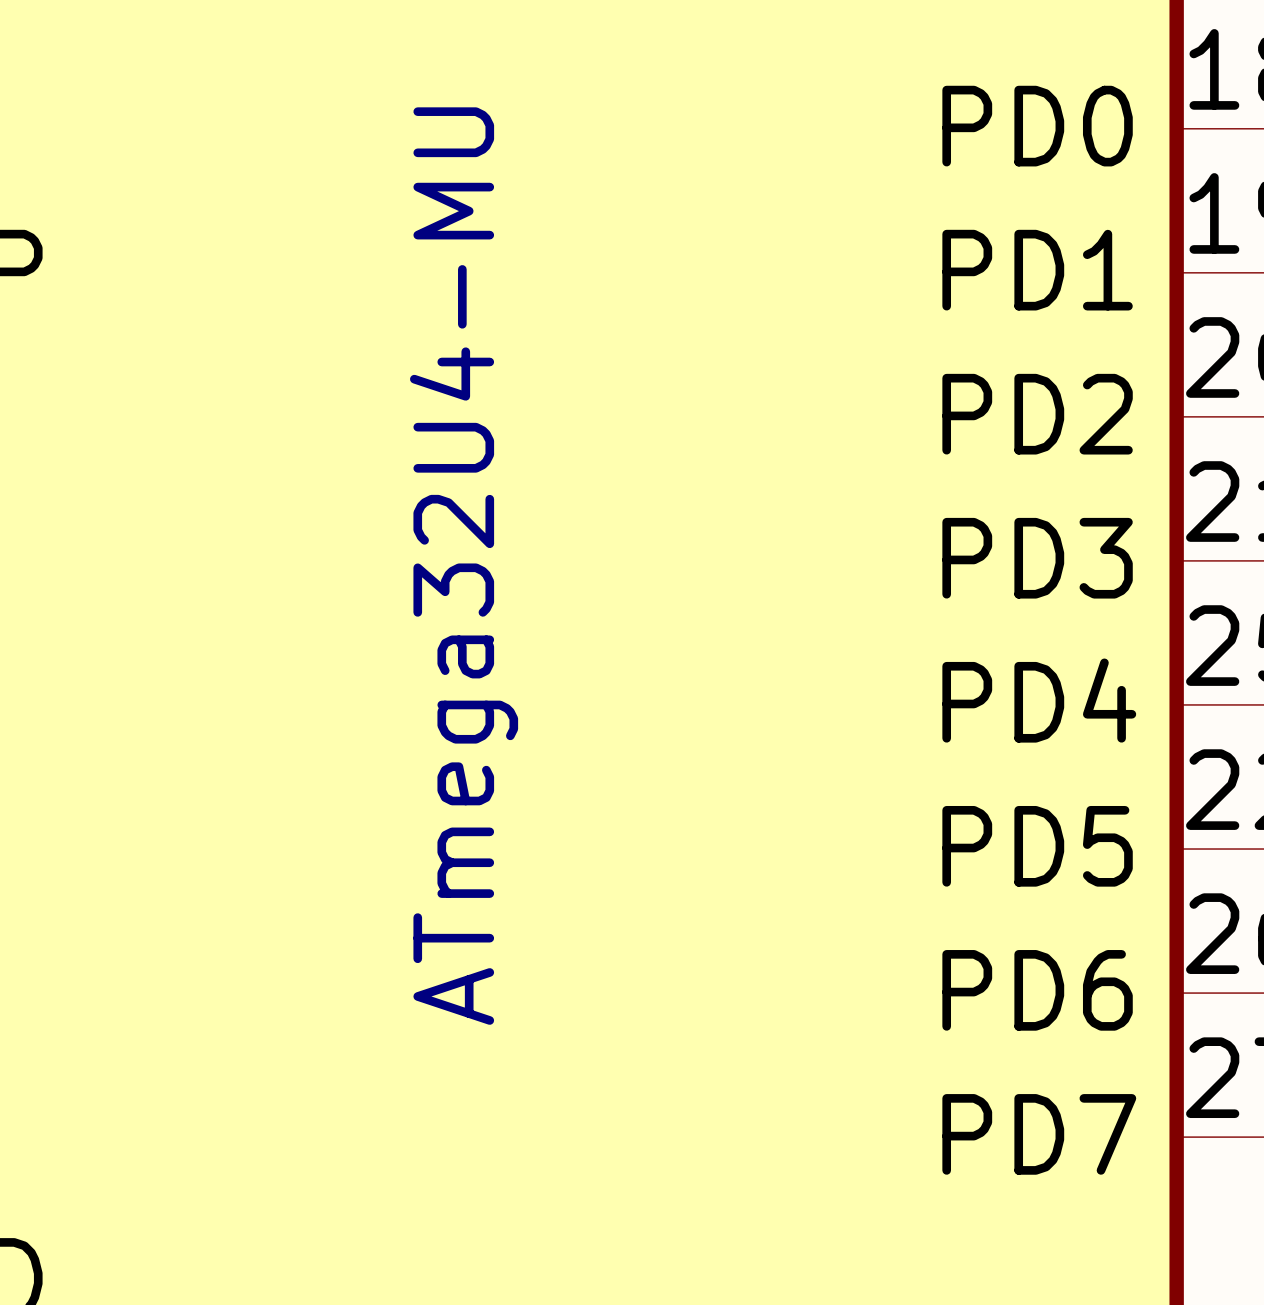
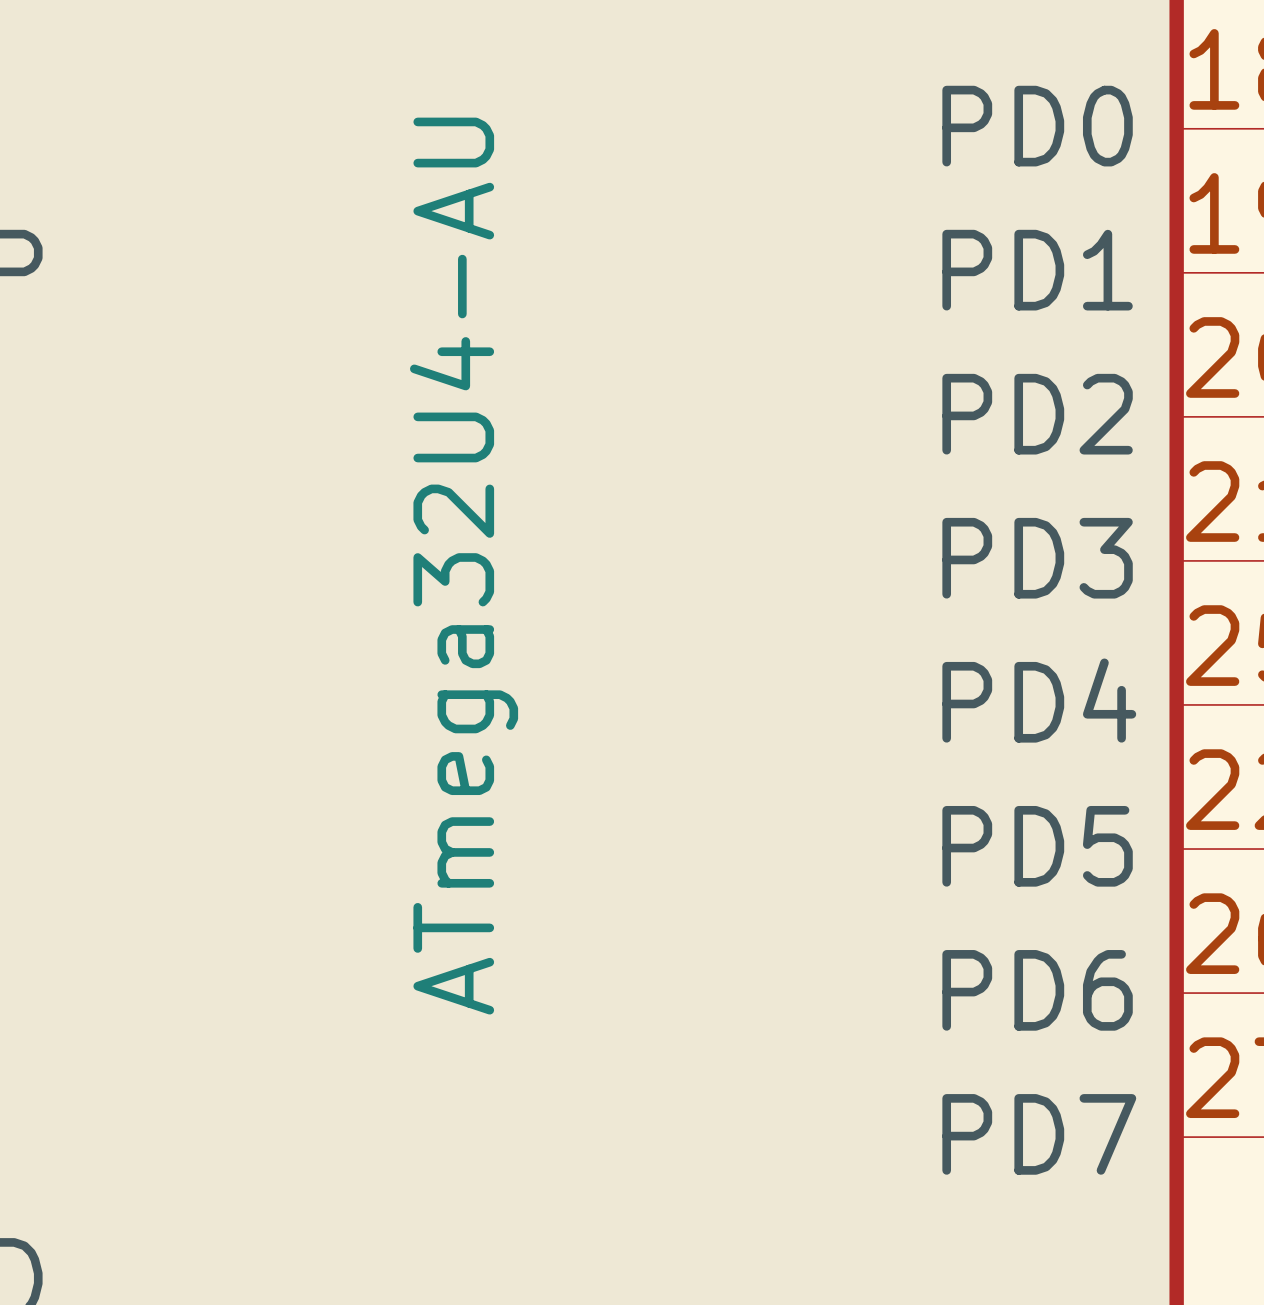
part value: ATmega32U4-MU (464, 566) -> ATmega32U4-AU (464, 566)

